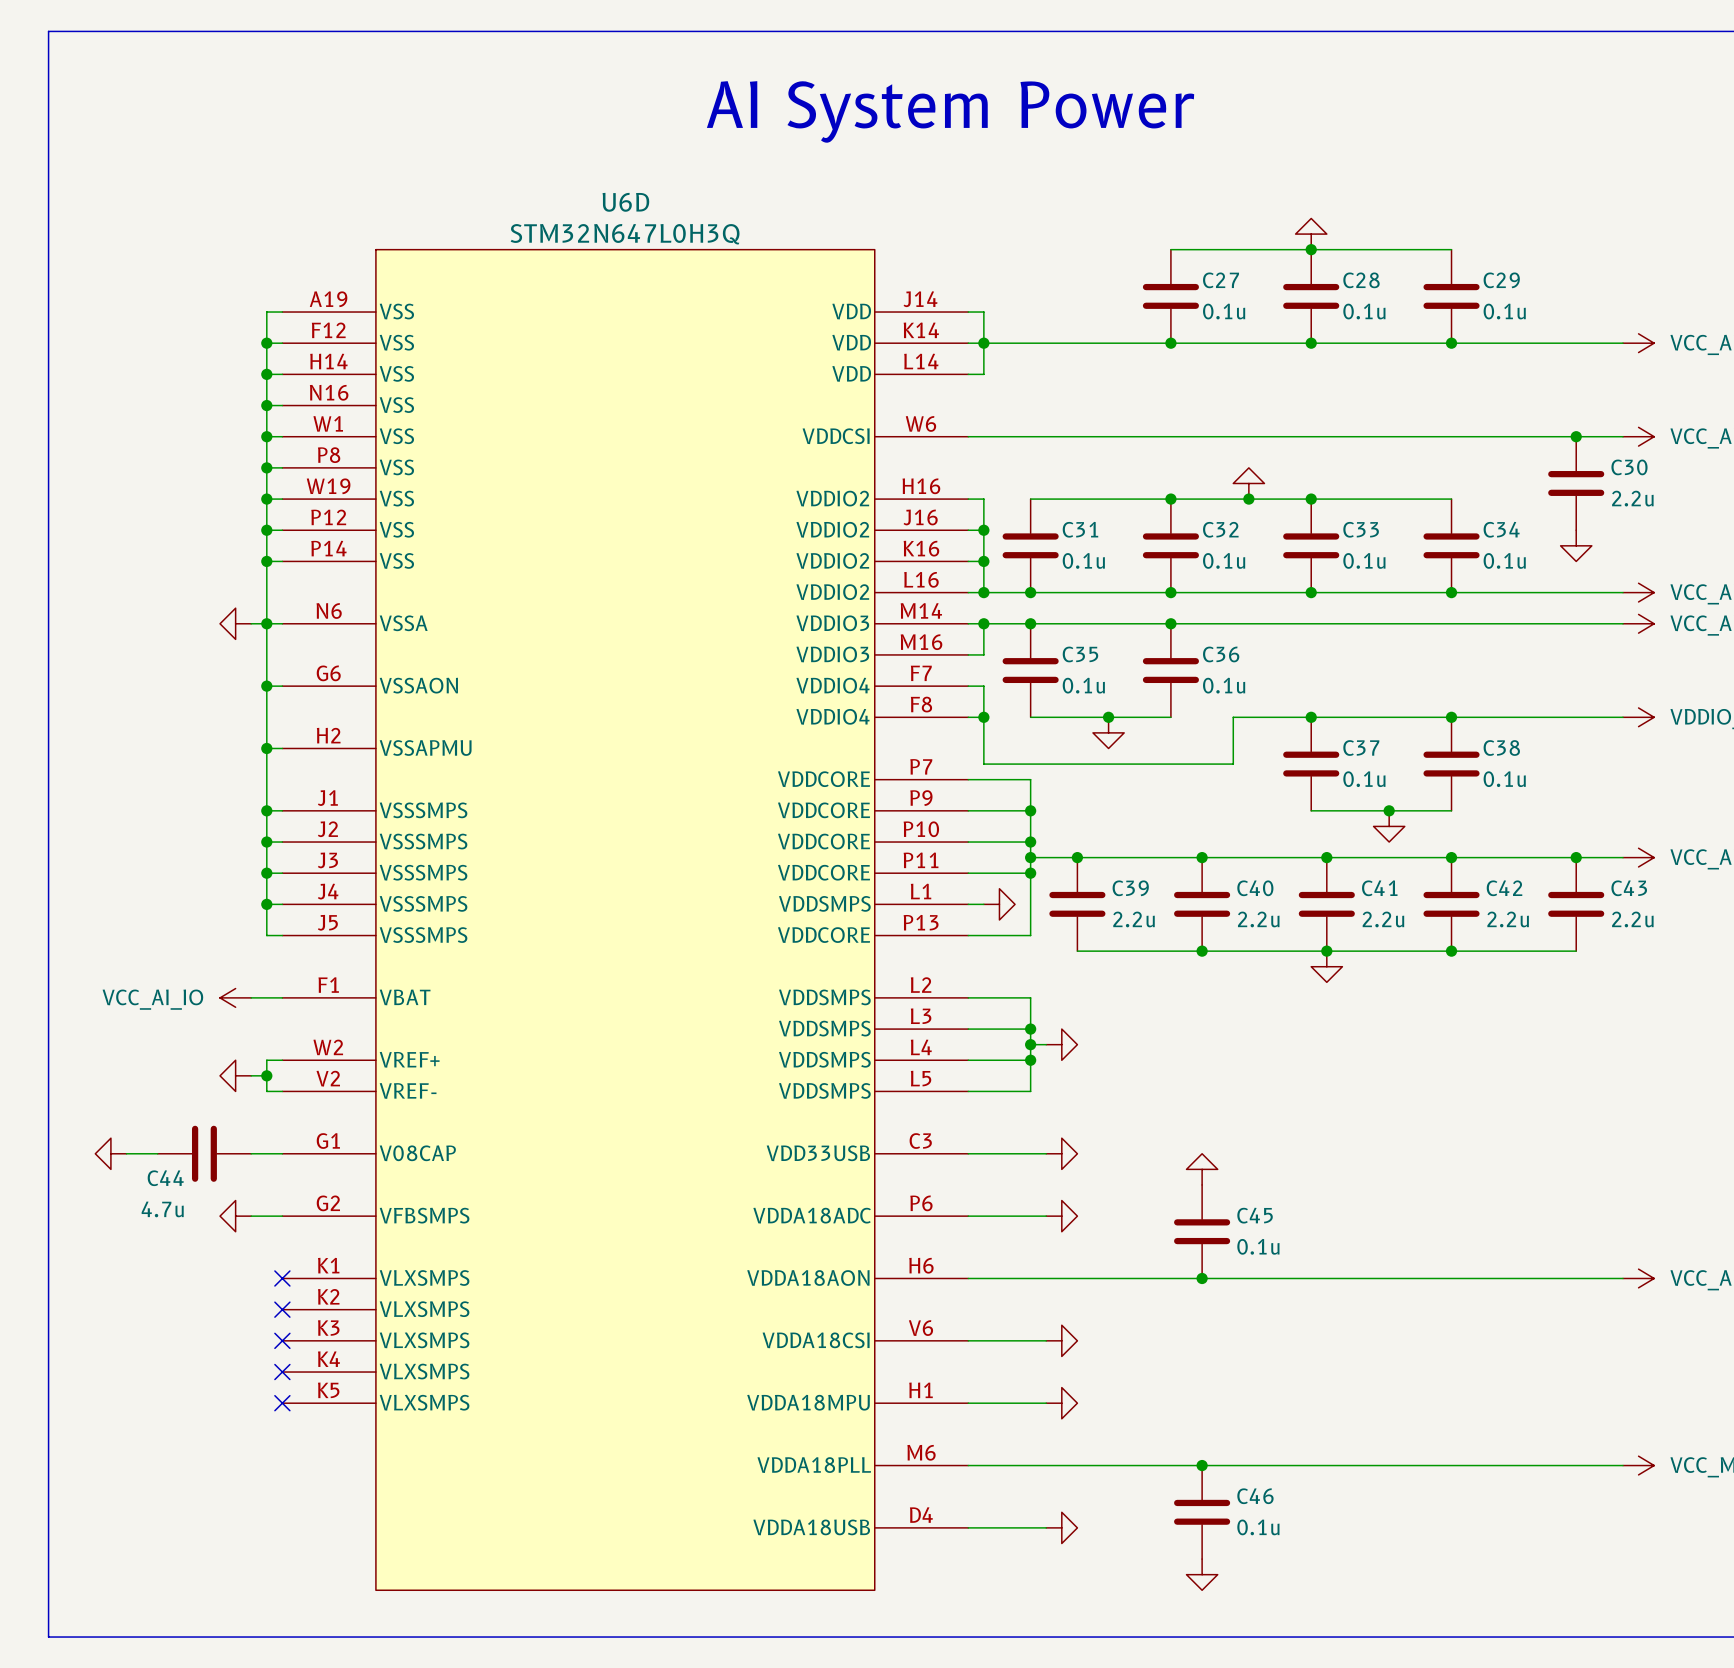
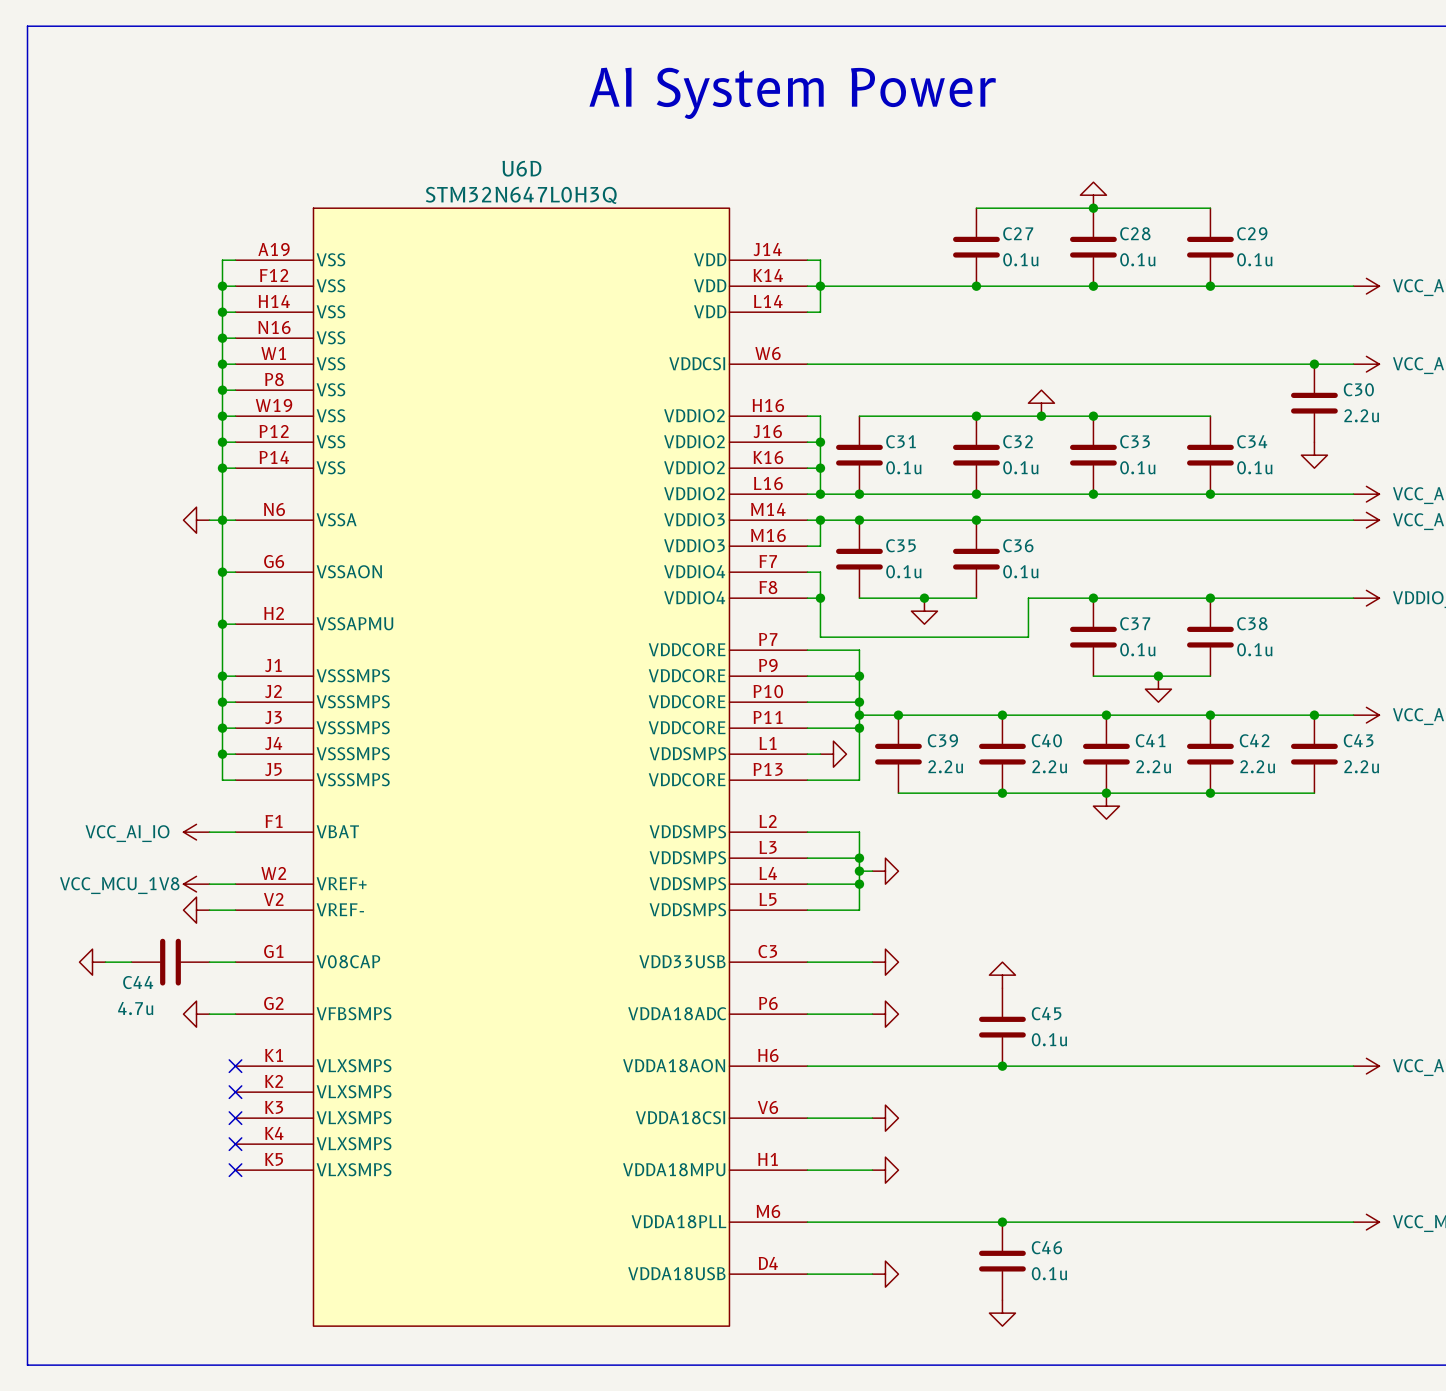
line: (48, 31) (48, 1637) -> (40, 26) (27, 26) (27, 1365) (40, 1365)
power symbol: none -> VCC_MCU_1V8 (196, 884)
wire: (266, 1060) (266, 1091) -> (222, 884) (209, 884)
power symbol position: (235, 1075) -> (196, 910)
wire: (251, 1075) (266, 1075) -> (209, 910) (222, 910)
junction: (266, 1075) -> none

